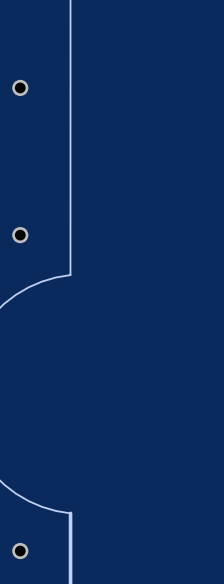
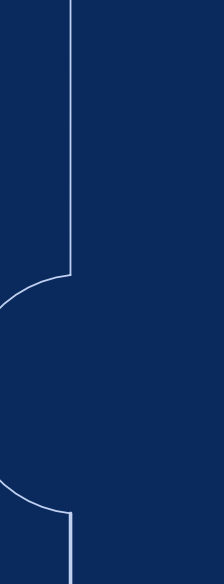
via: (20, 87) -> none
via: (20, 235) -> none
via: (20, 551) -> none

